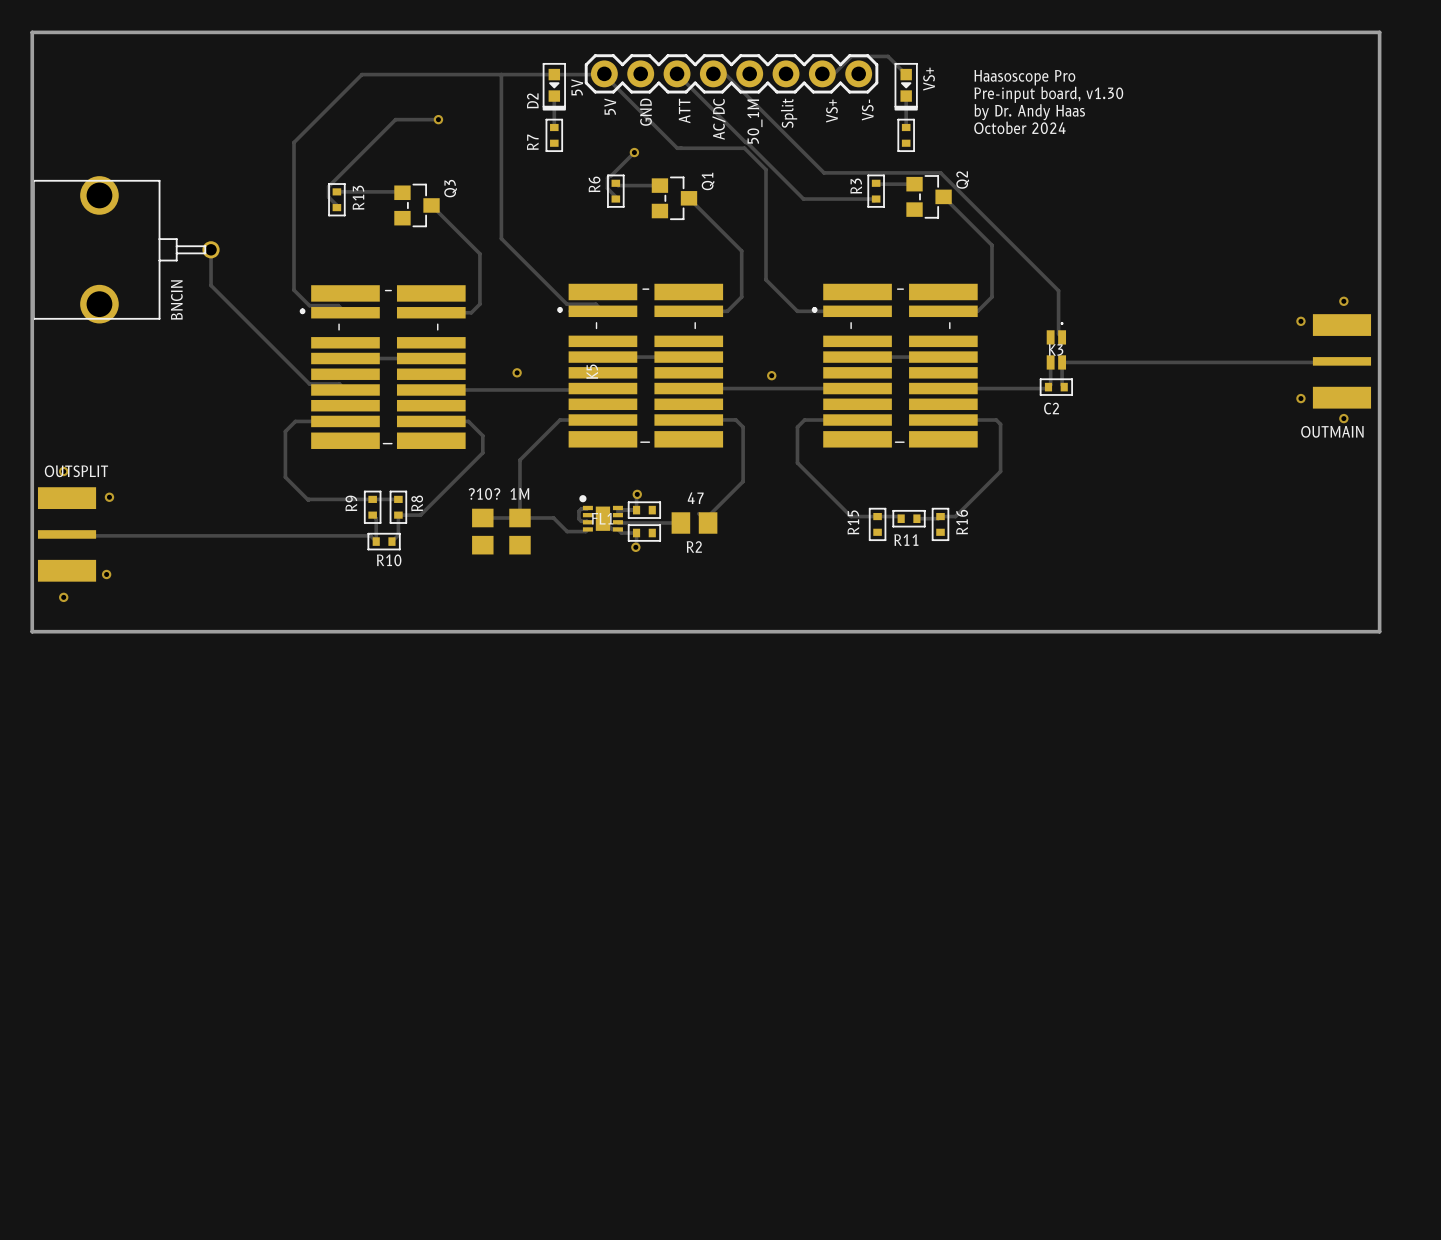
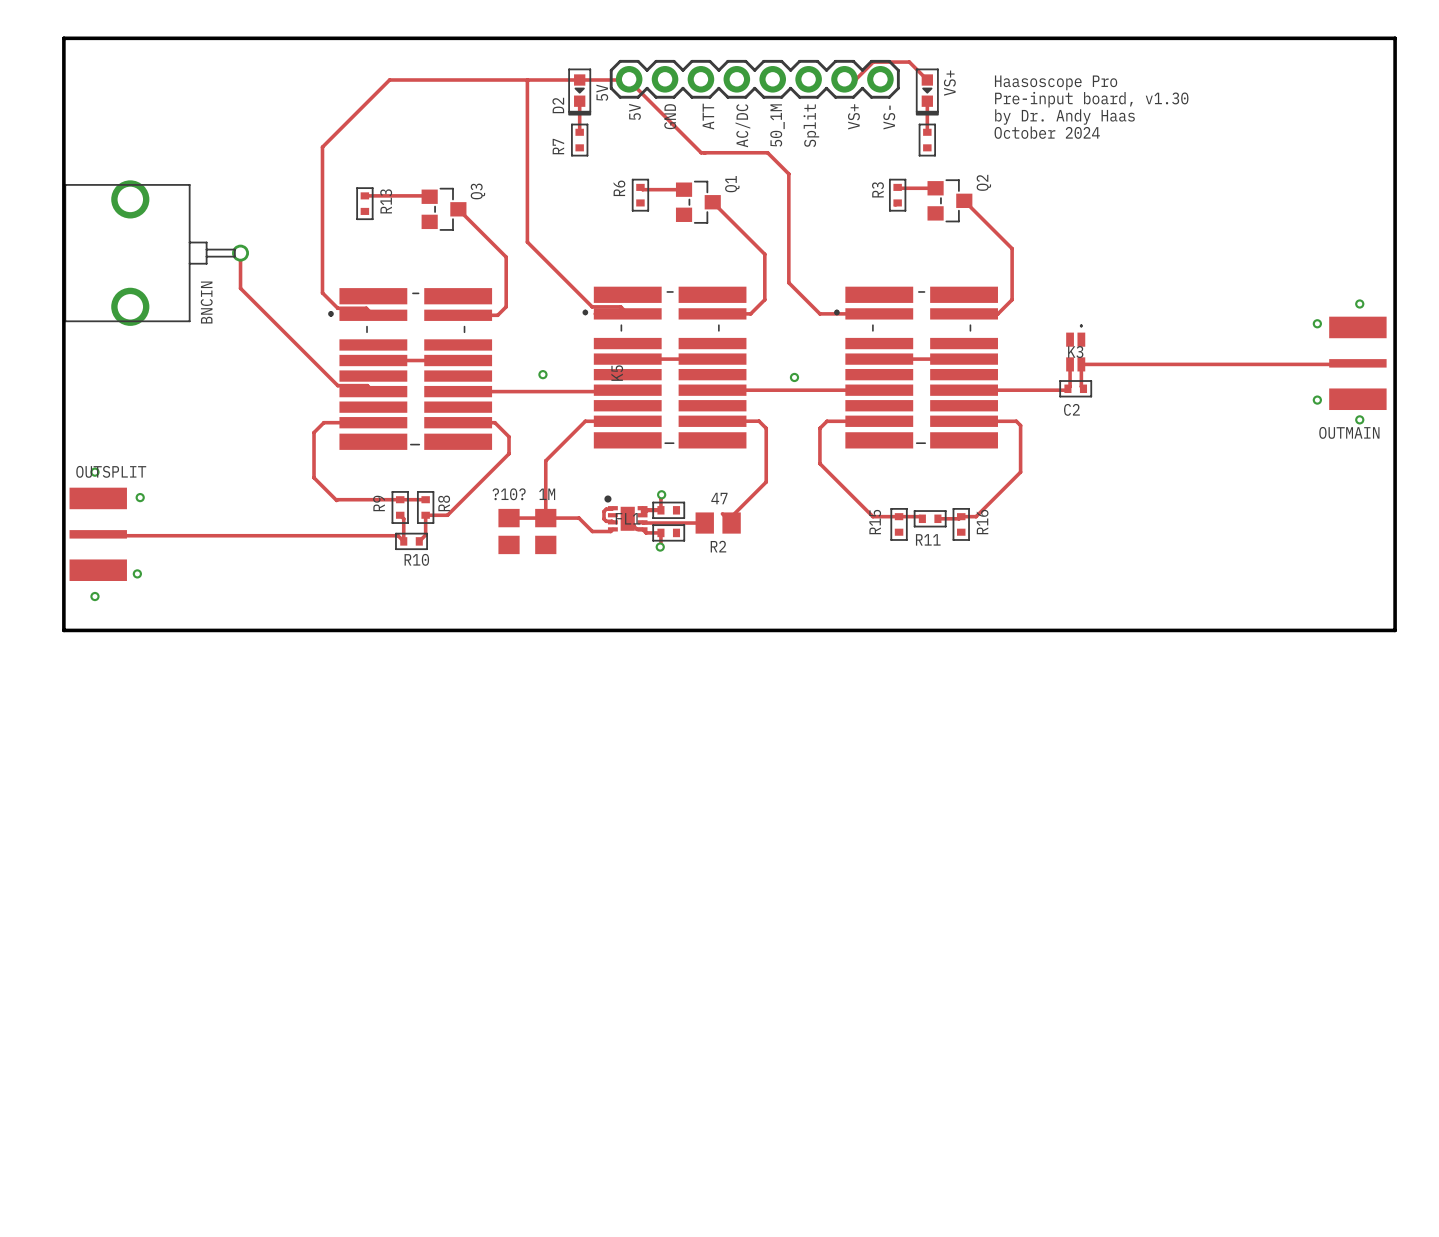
track: (677, 73) (803, 199) (876, 199) -> none
track: (713, 73) (725, 73) (824, 172) (940, 172) (1058, 290) (1058, 333) (1062, 337) -> none
track: (438, 119) (395, 119) (328, 186) (328, 197) (336, 207) -> none
via: (438, 119) -> none
track: (634, 152) (607, 178) (607, 188) (615, 199) -> none
via: (634, 152) -> none

